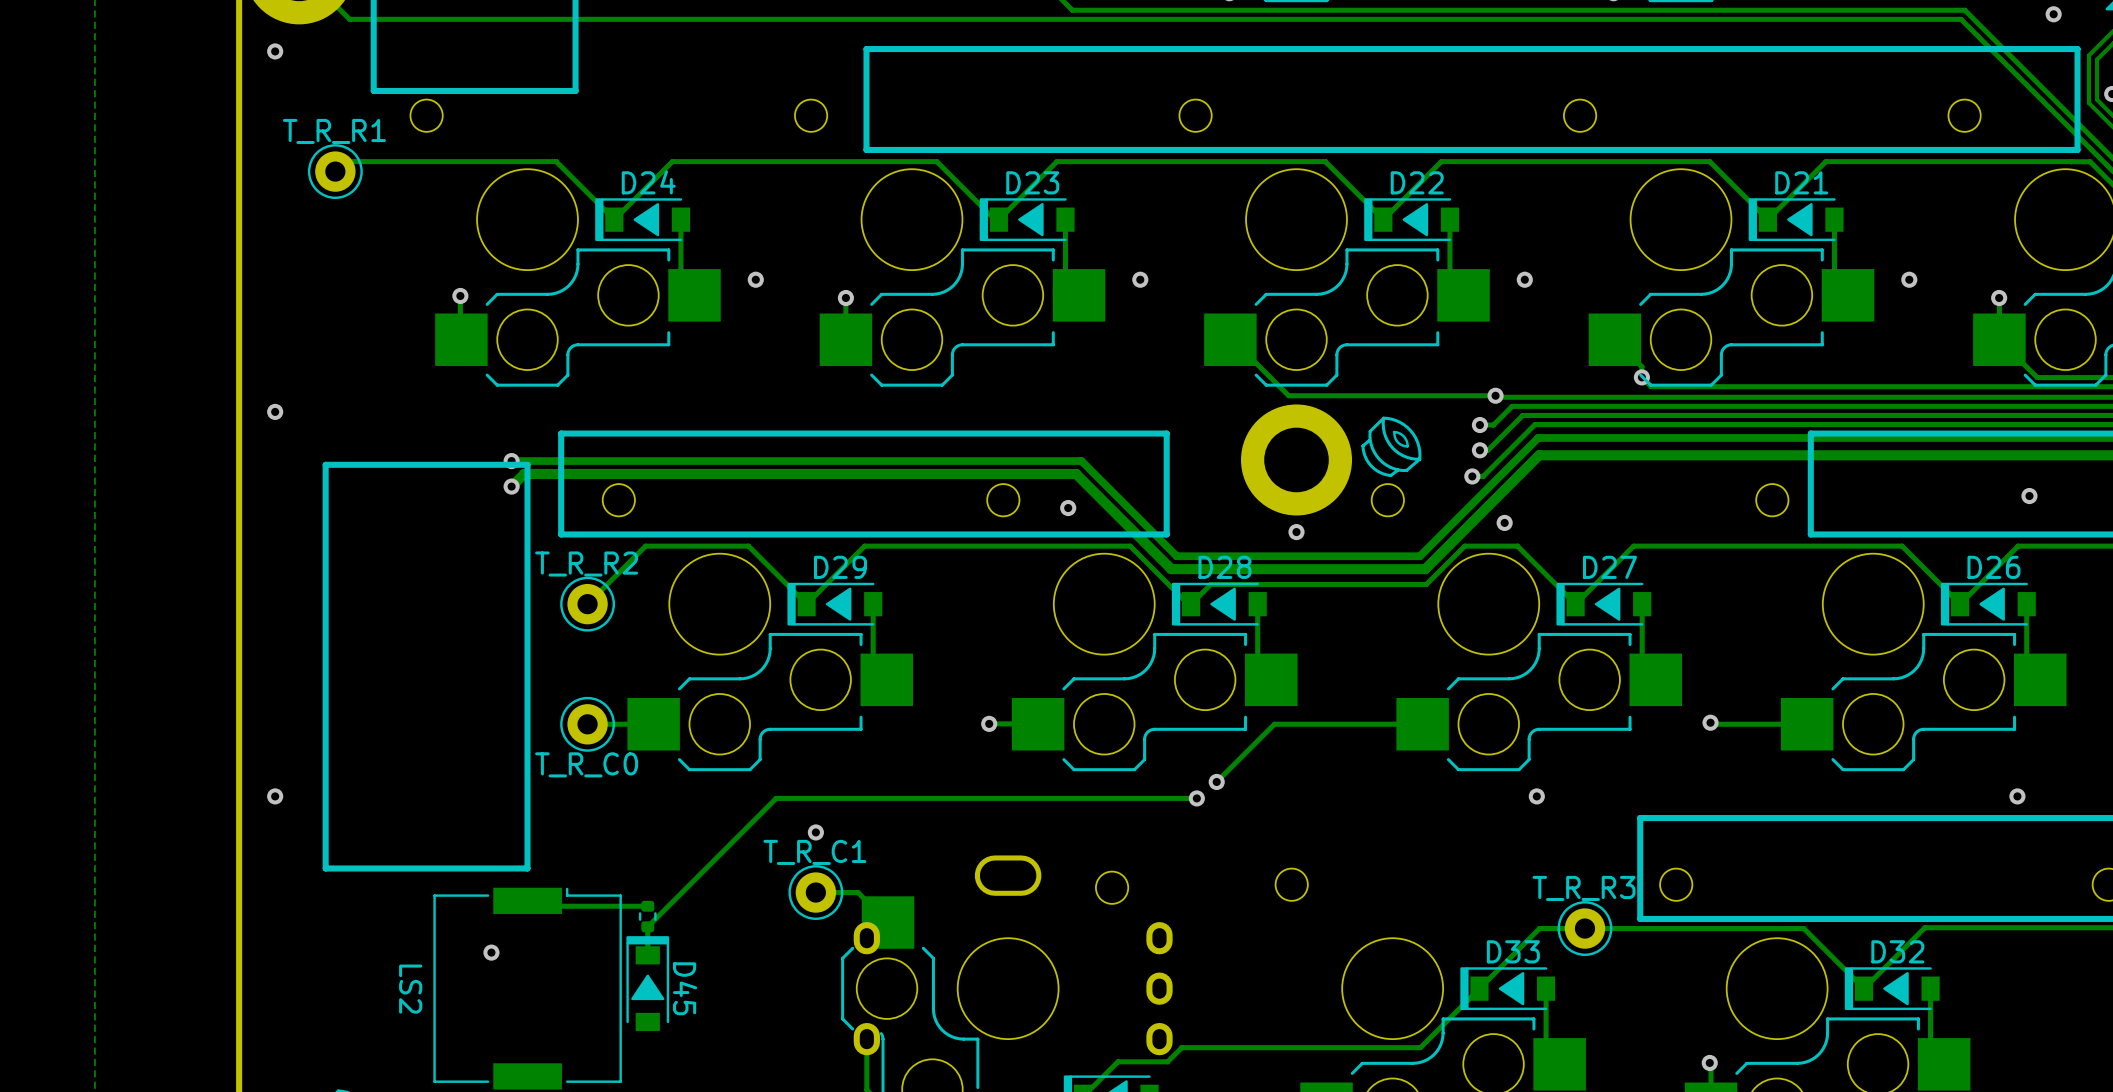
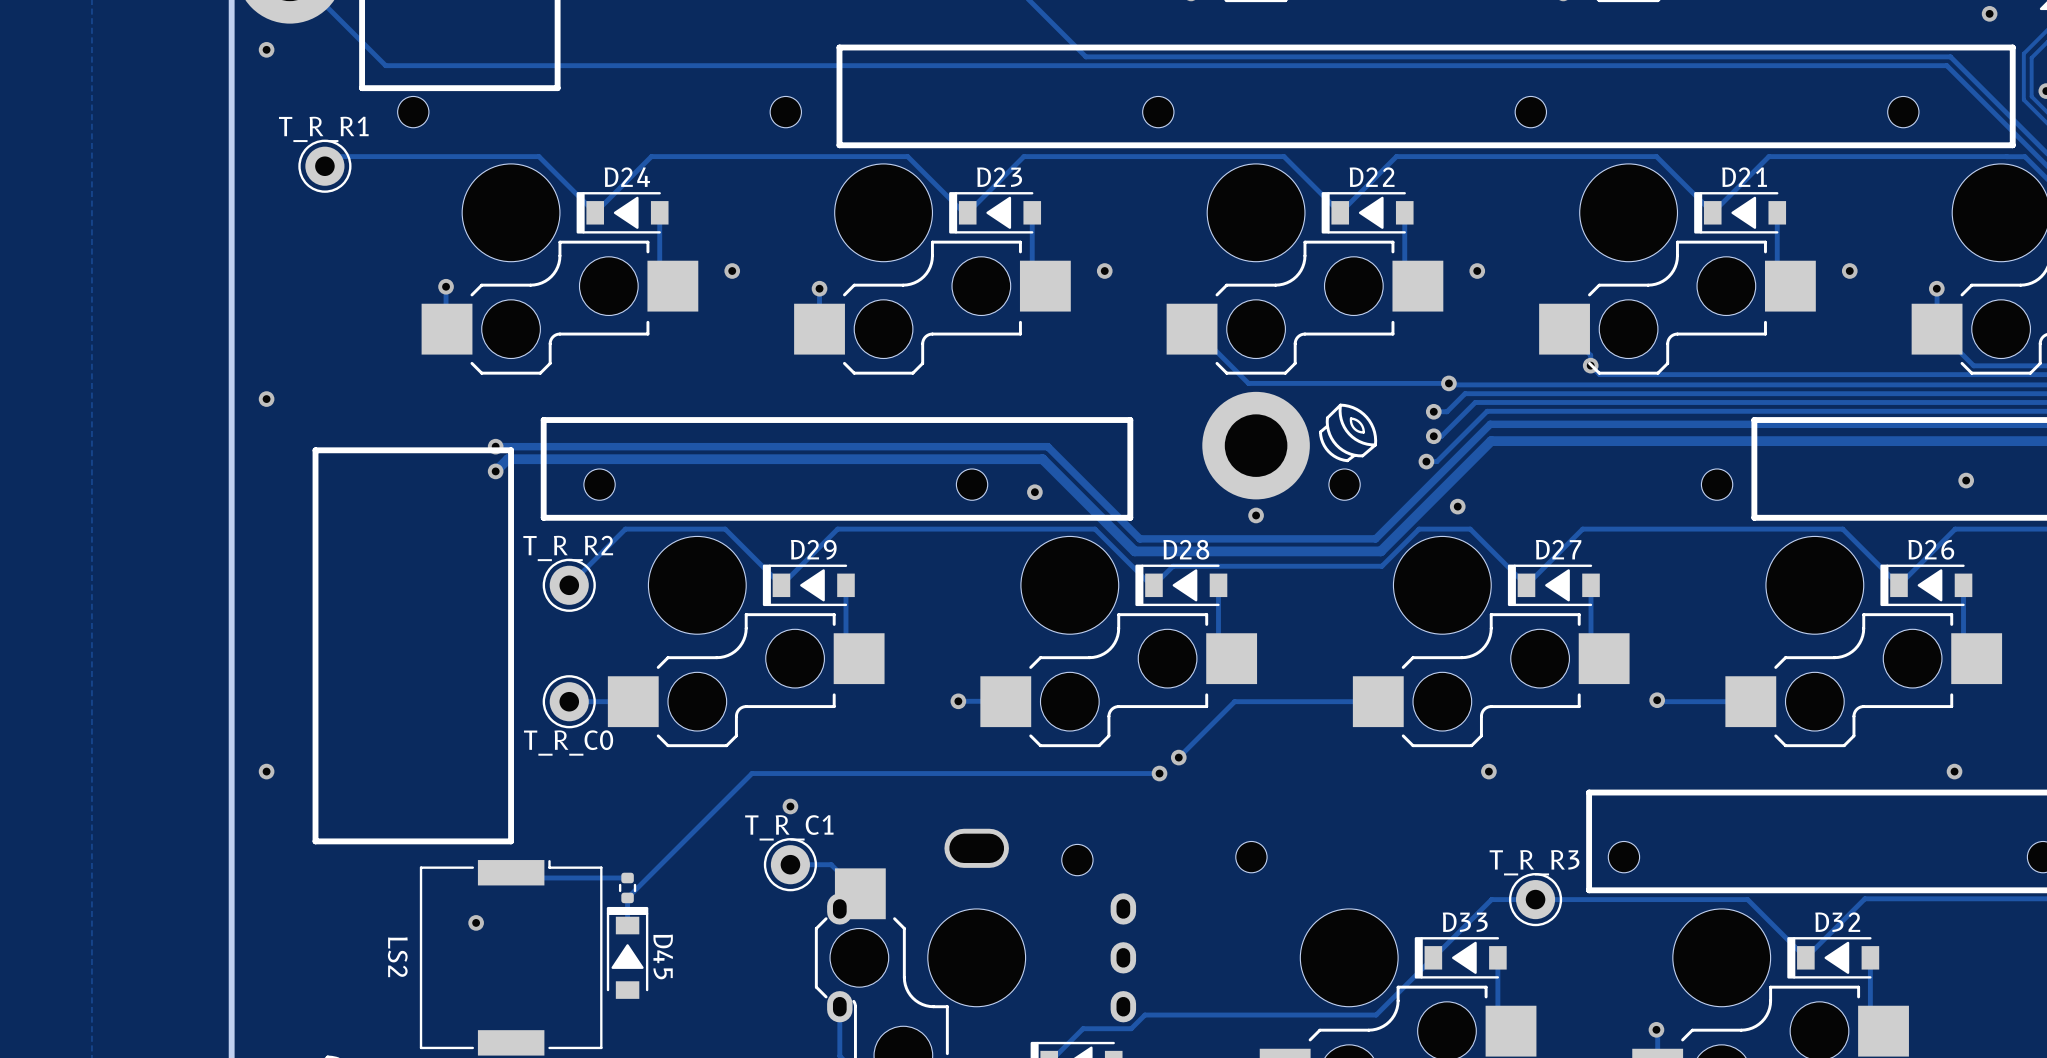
track: (1072, 10) (1964, 10) (2013, 58) -> (1038, 9) (1085, 56) (1950, 56)
track: (349, 19) (1961, 19) (2009, 67) -> (338, 18) (385, 65) (1946, 65)

